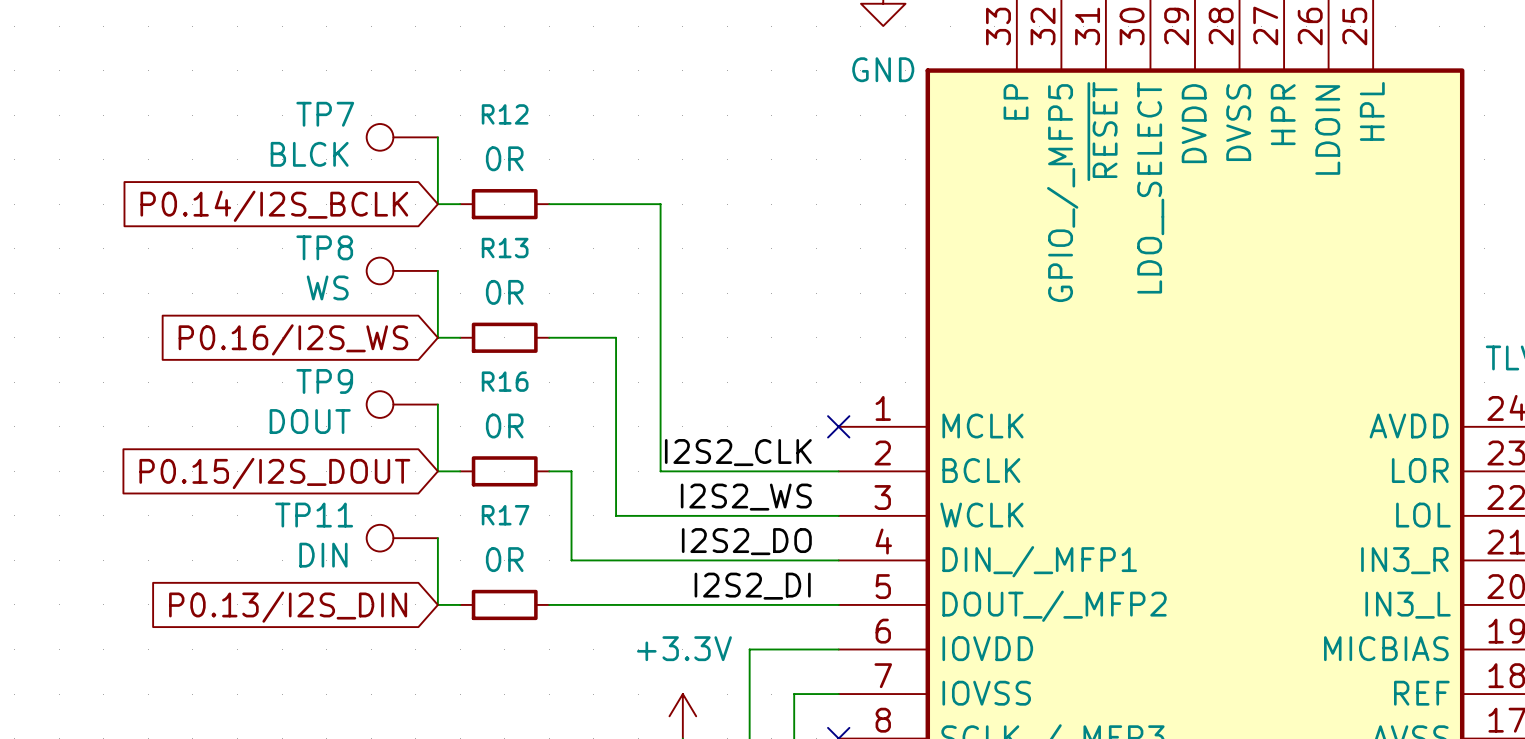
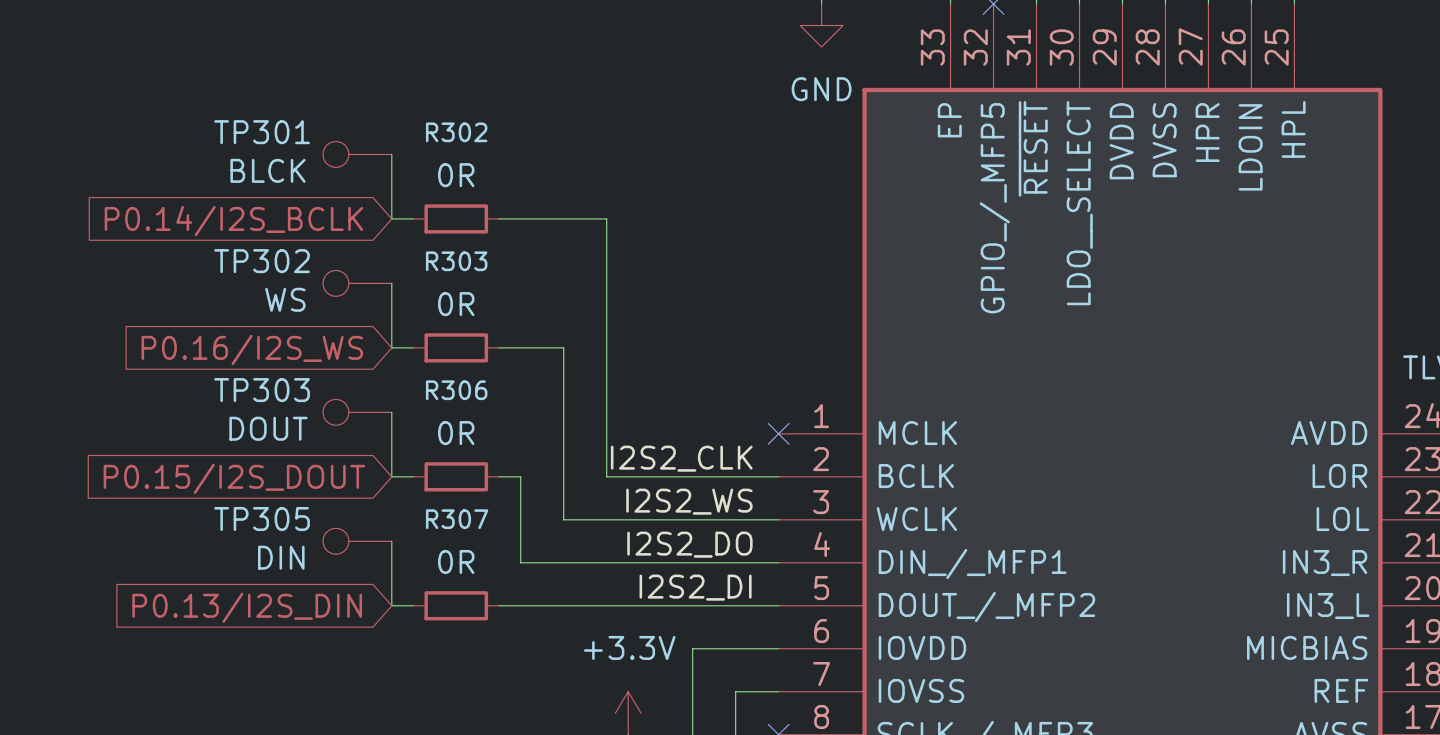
TP7 name: TP7 (325, 114) -> TP301 (262, 132)
R12 name: R12 (505, 114) -> R302 (456, 132)
TP8 name: TP8 (324, 247) -> TP302 (262, 261)
R13 name: R13 (505, 248) -> R303 (456, 261)
TP9 name: TP9 (324, 381) -> TP303 (262, 390)
R16 name: R16 (505, 381) -> R306 (456, 390)
TP11 name: TP11 (314, 515) -> TP305 (262, 519)
R17 name: R17 (505, 515) -> R307 (457, 519)

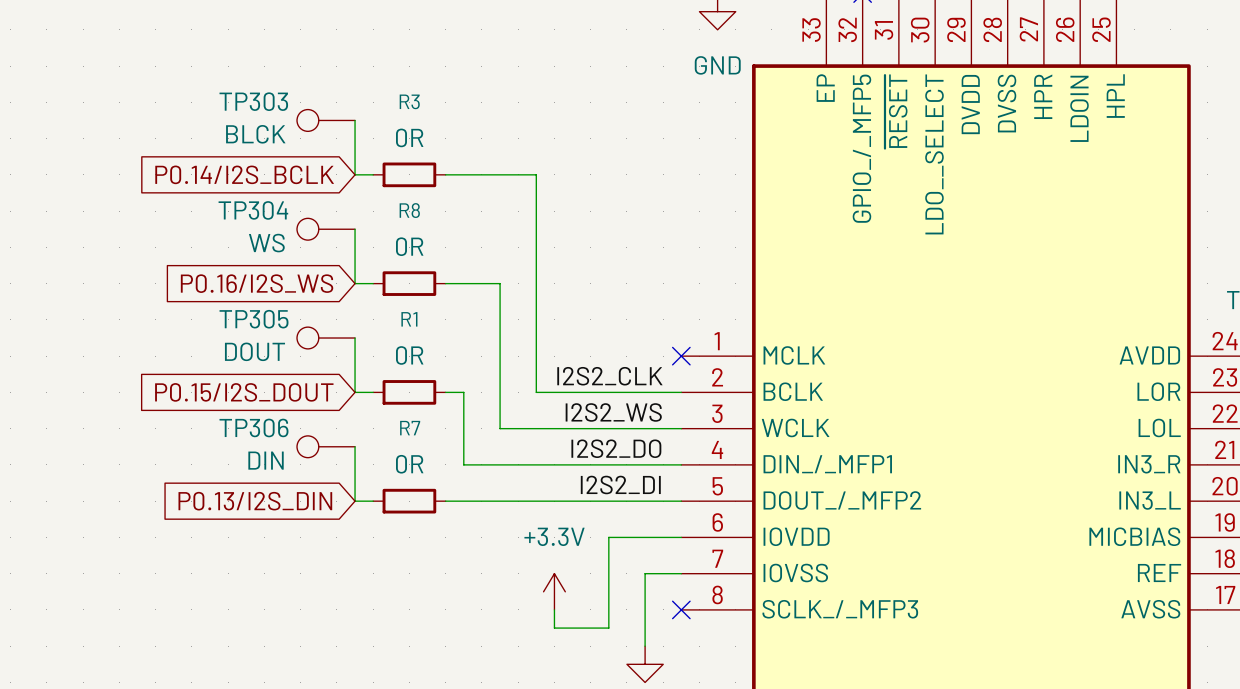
TP301 name: TP301 (262, 132) -> TP303 (253, 101)
R302 name: R302 (456, 132) -> R3 (409, 101)
TP302 name: TP302 (262, 261) -> TP304 (253, 210)
R303 name: R303 (456, 261) -> R8 (409, 210)
TP303 name: TP303 (262, 390) -> TP305 (254, 319)
R306 name: R306 (456, 390) -> R1 (409, 319)
TP305 name: TP305 (262, 519) -> TP306 (253, 427)
R307 name: R307 (457, 519) -> R7 (410, 428)

